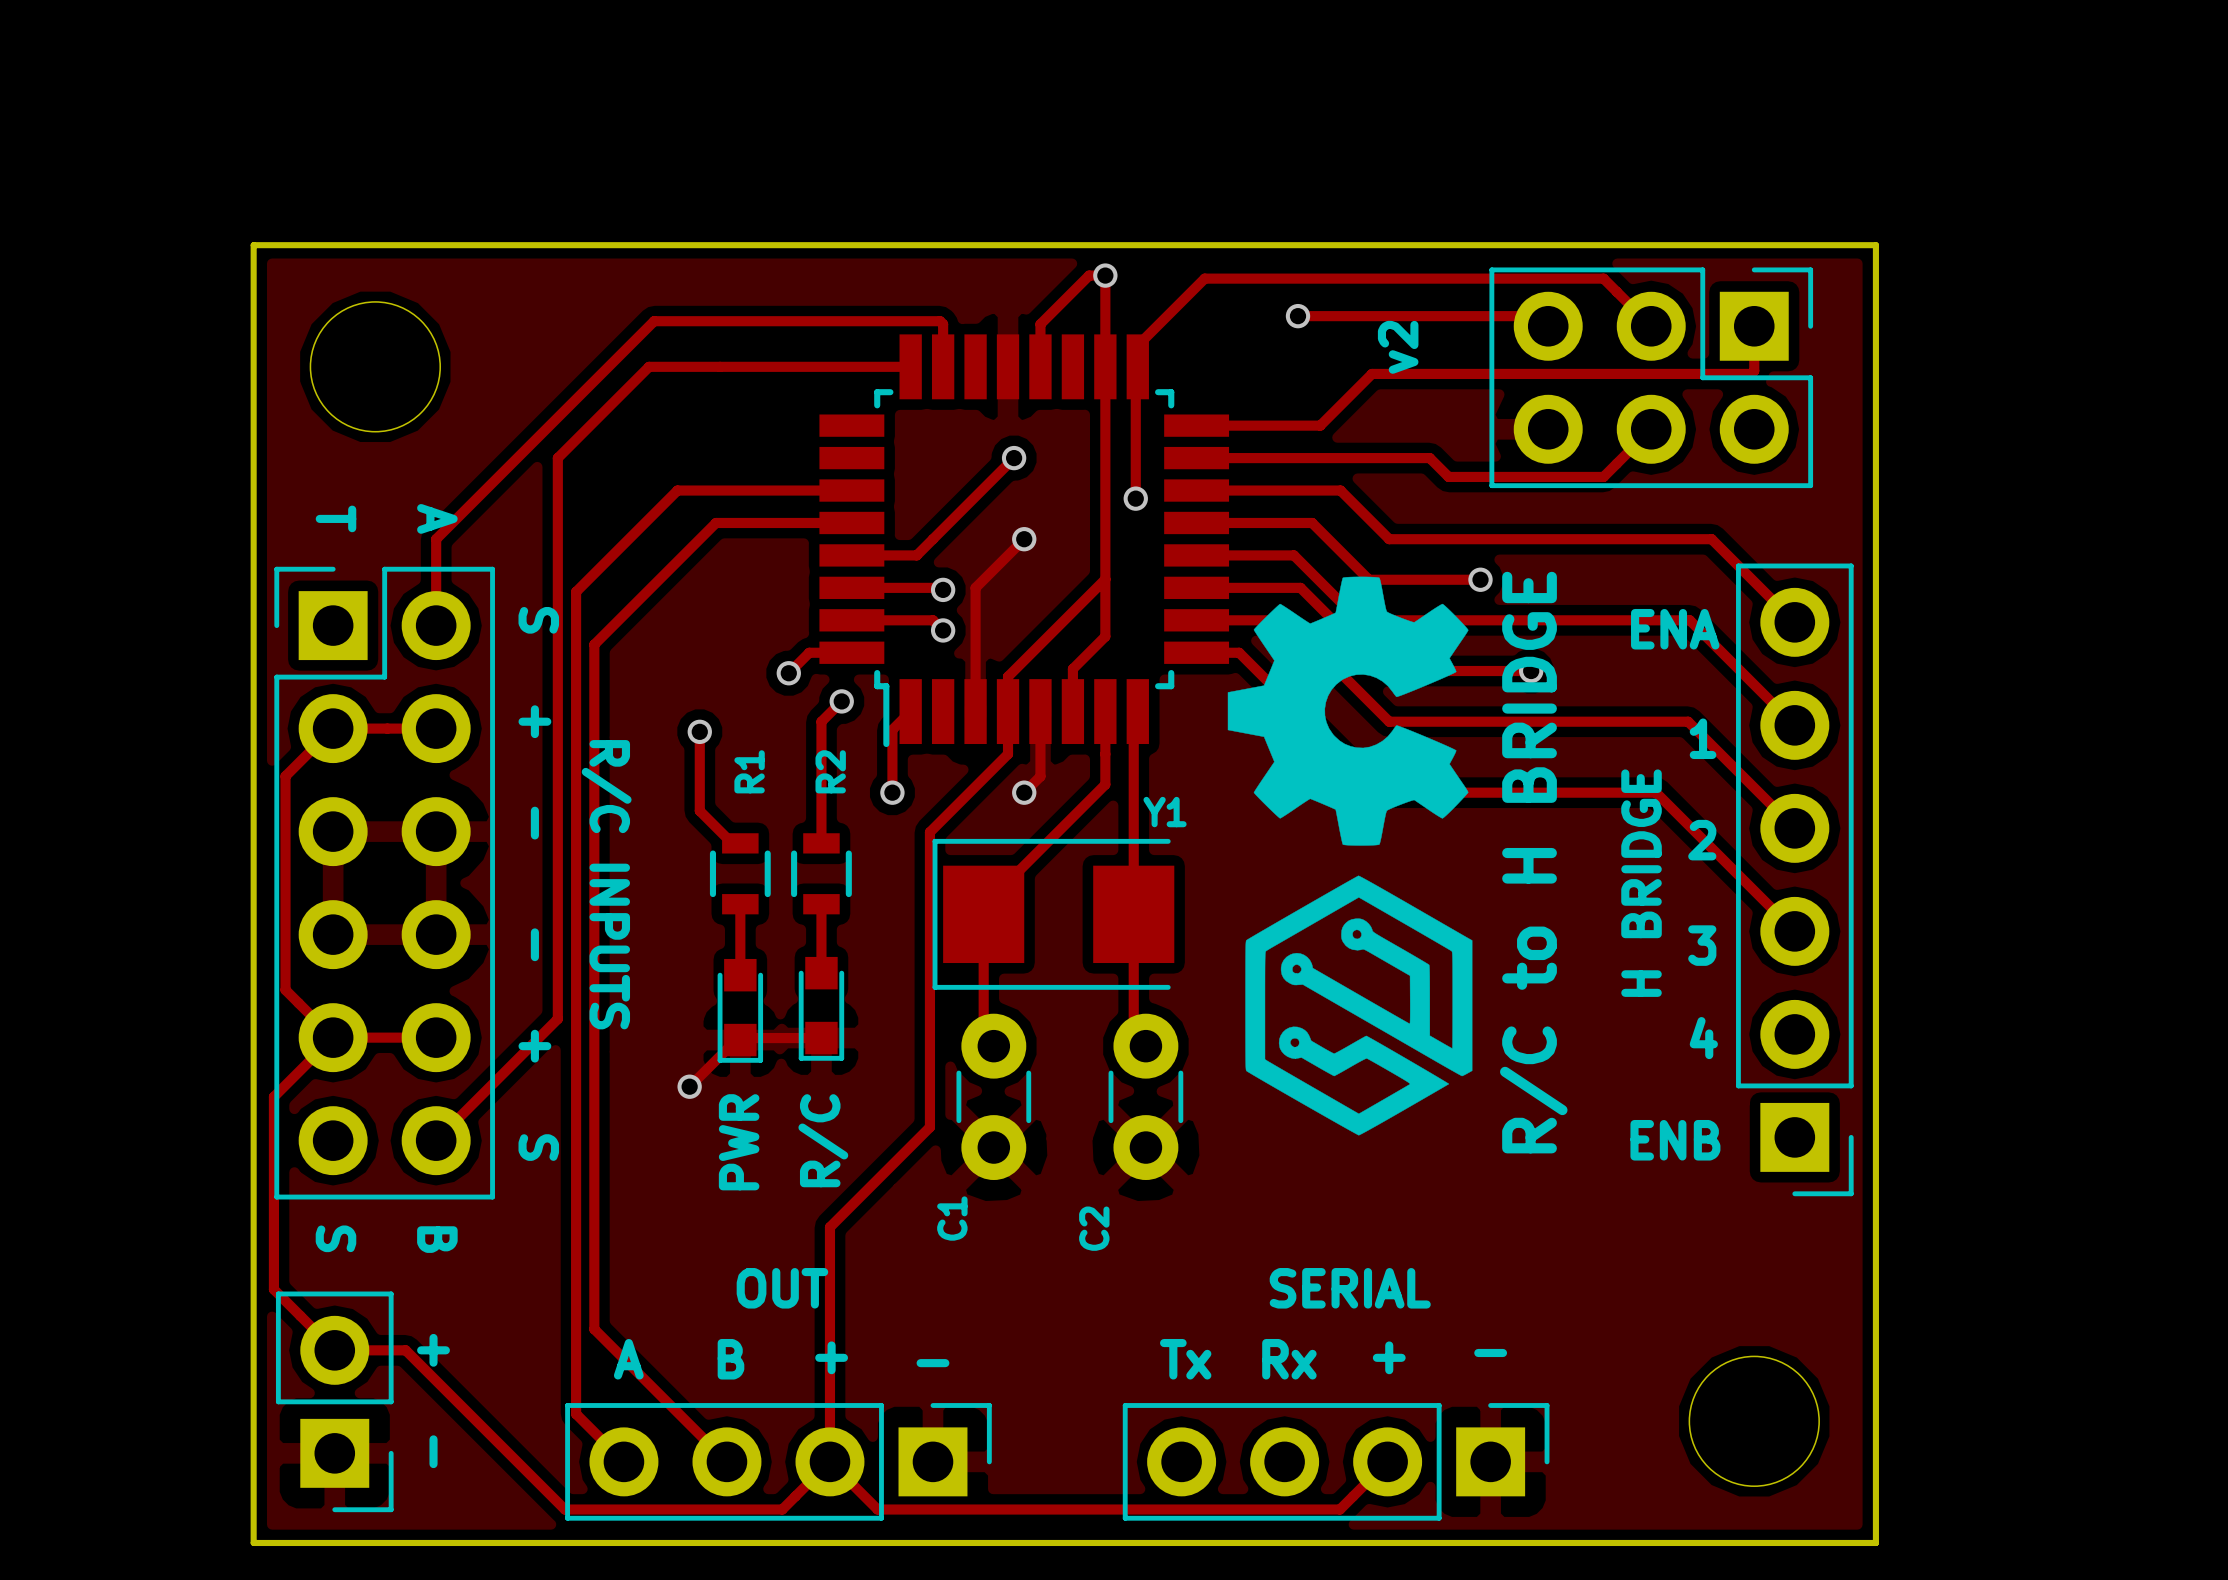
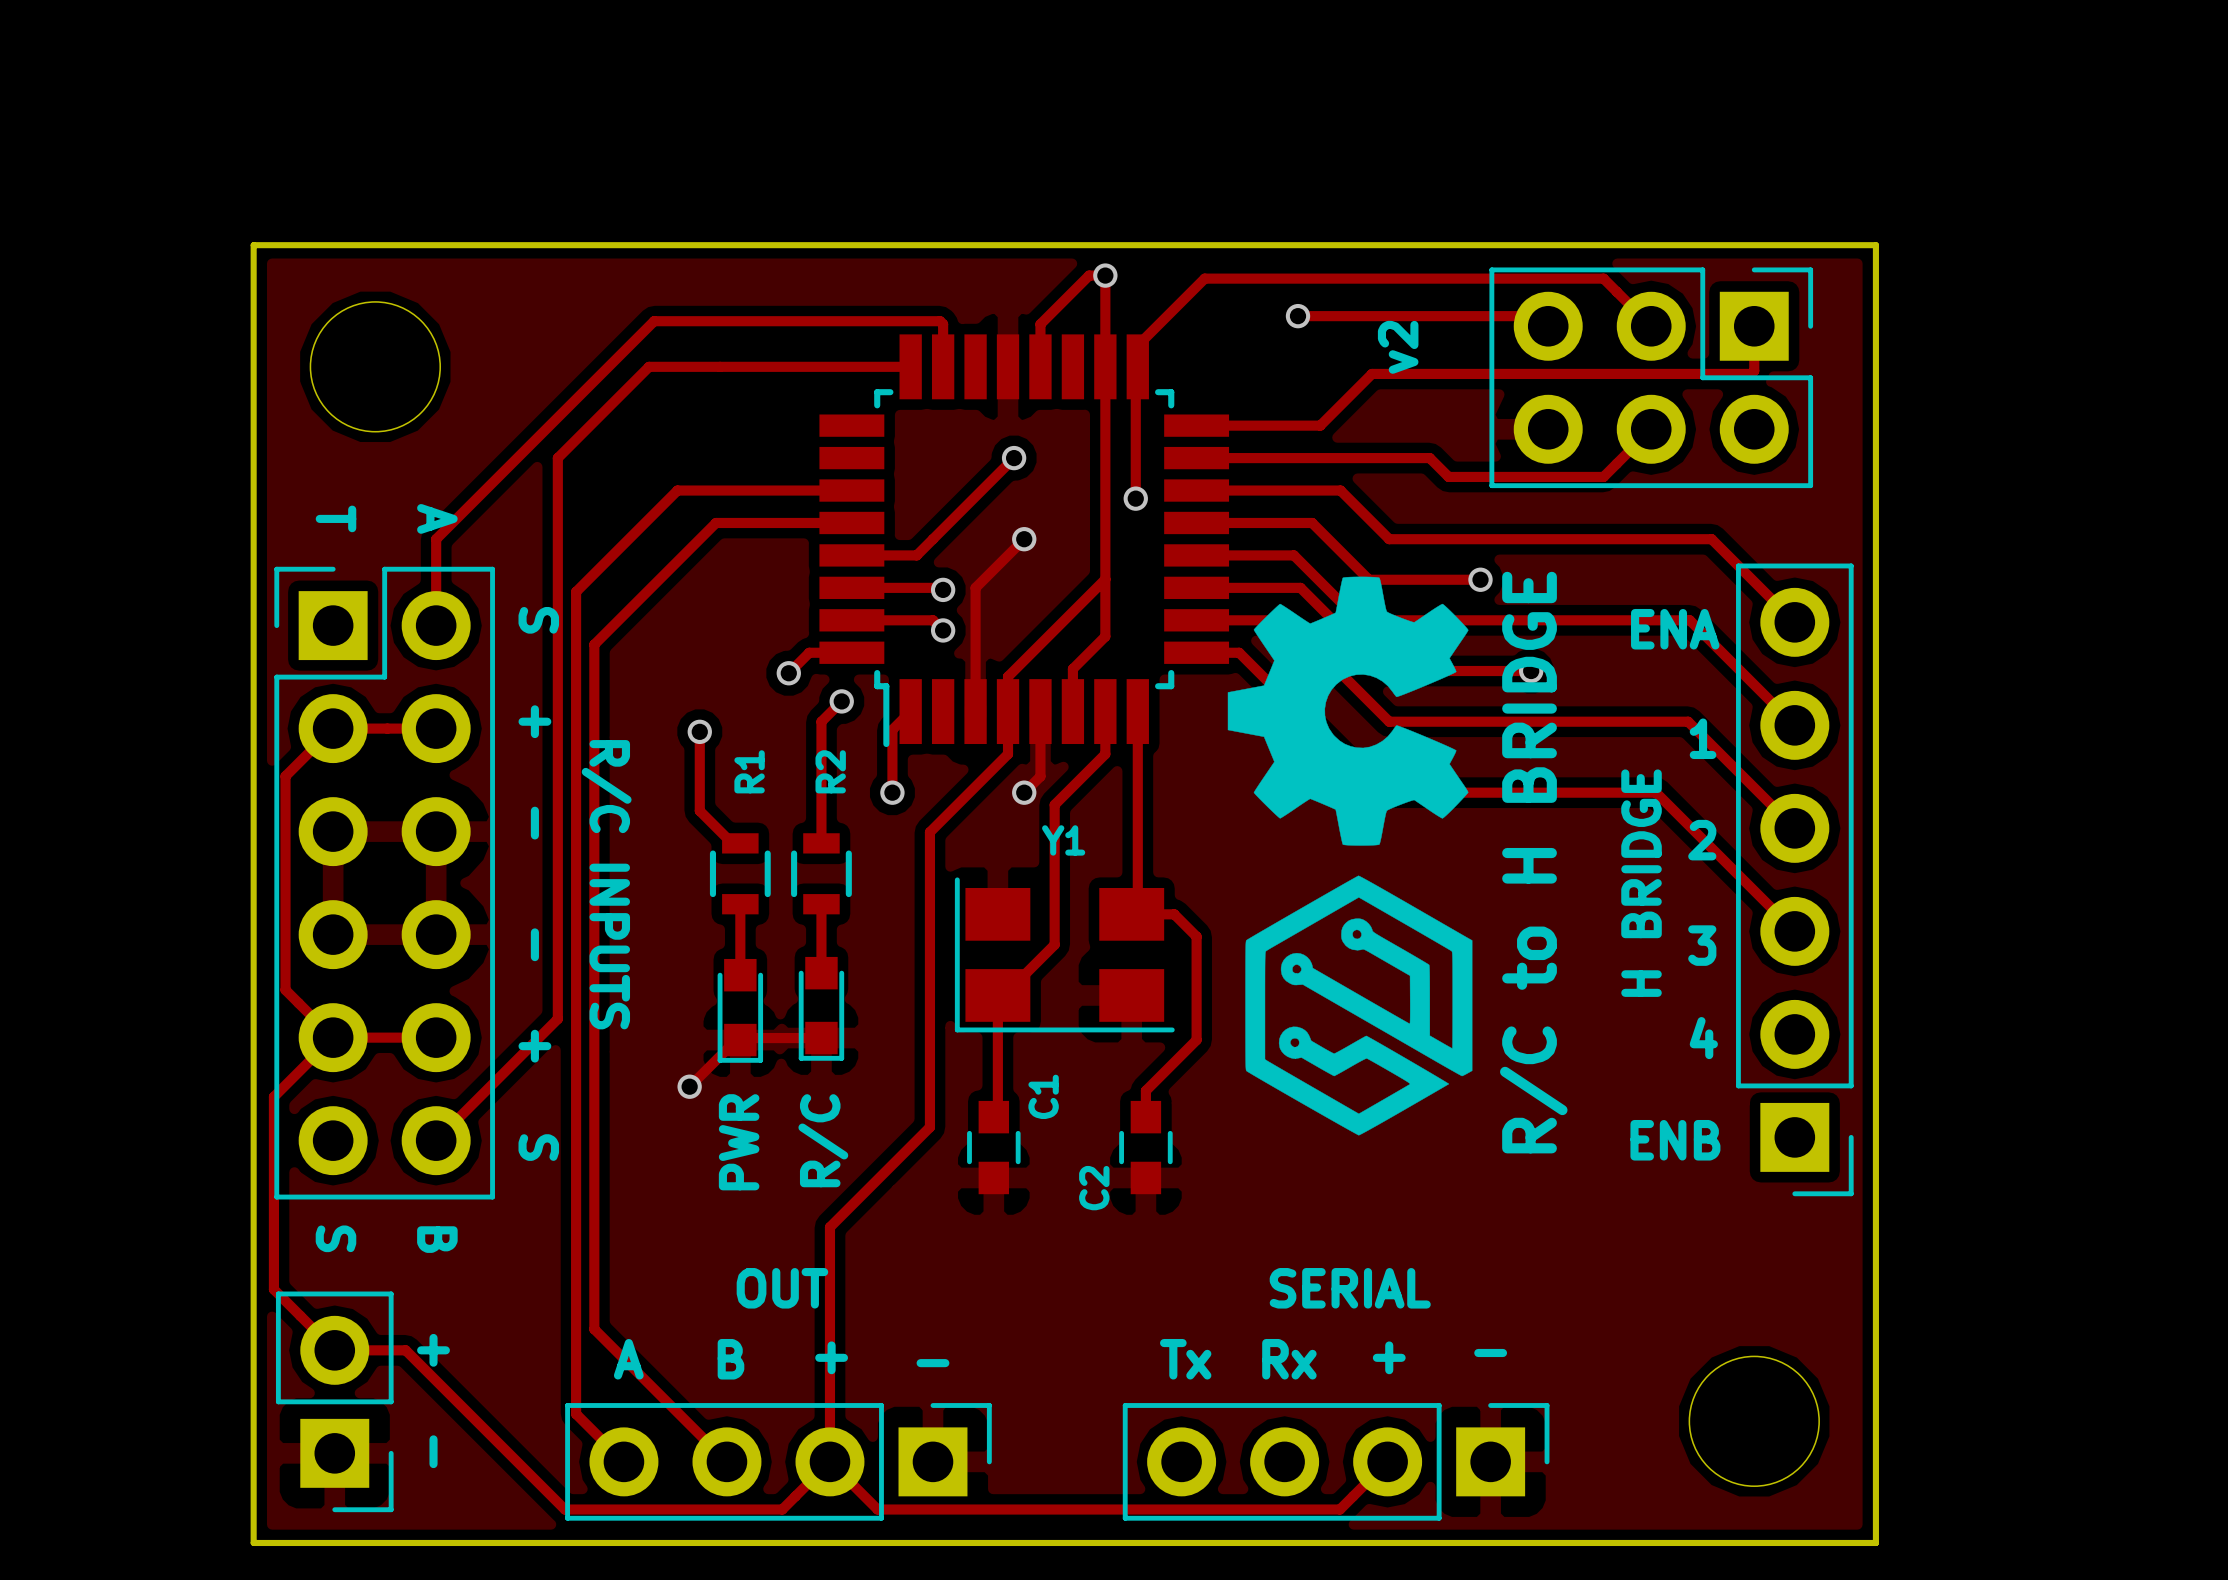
track: none -> (1137, 711) (1137, 908) (1131, 914) (1174, 914) (1196, 936) (1196, 1040) (1145, 1090) (1145, 1117)
track: (1133, 715) (1133, 1033) (1145, 1046) -> none
track: (1105, 754) (1105, 784) (983, 906) (983, 1036) (993, 1046) -> (1105, 754) (1054, 804) (1054, 944) (1003, 995) (997, 995) (997, 1113) (993, 1117)
Y1 name position: Y1 (1165, 812) -> Y1 (1063, 840)
Y1 footprint: [932, 838, 1175, 990] -> [954, 877, 1175, 1033]
C1 footprint: [956, 1013, 1032, 1180] -> [967, 1100, 1021, 1195]
C2 footprint: [1108, 1013, 1184, 1180] -> [1119, 1100, 1173, 1195]
C1 name position: C1 (952, 1218) -> C1 (1043, 1096)
C2 name position: C2 (1094, 1228) -> C2 (1094, 1188)

